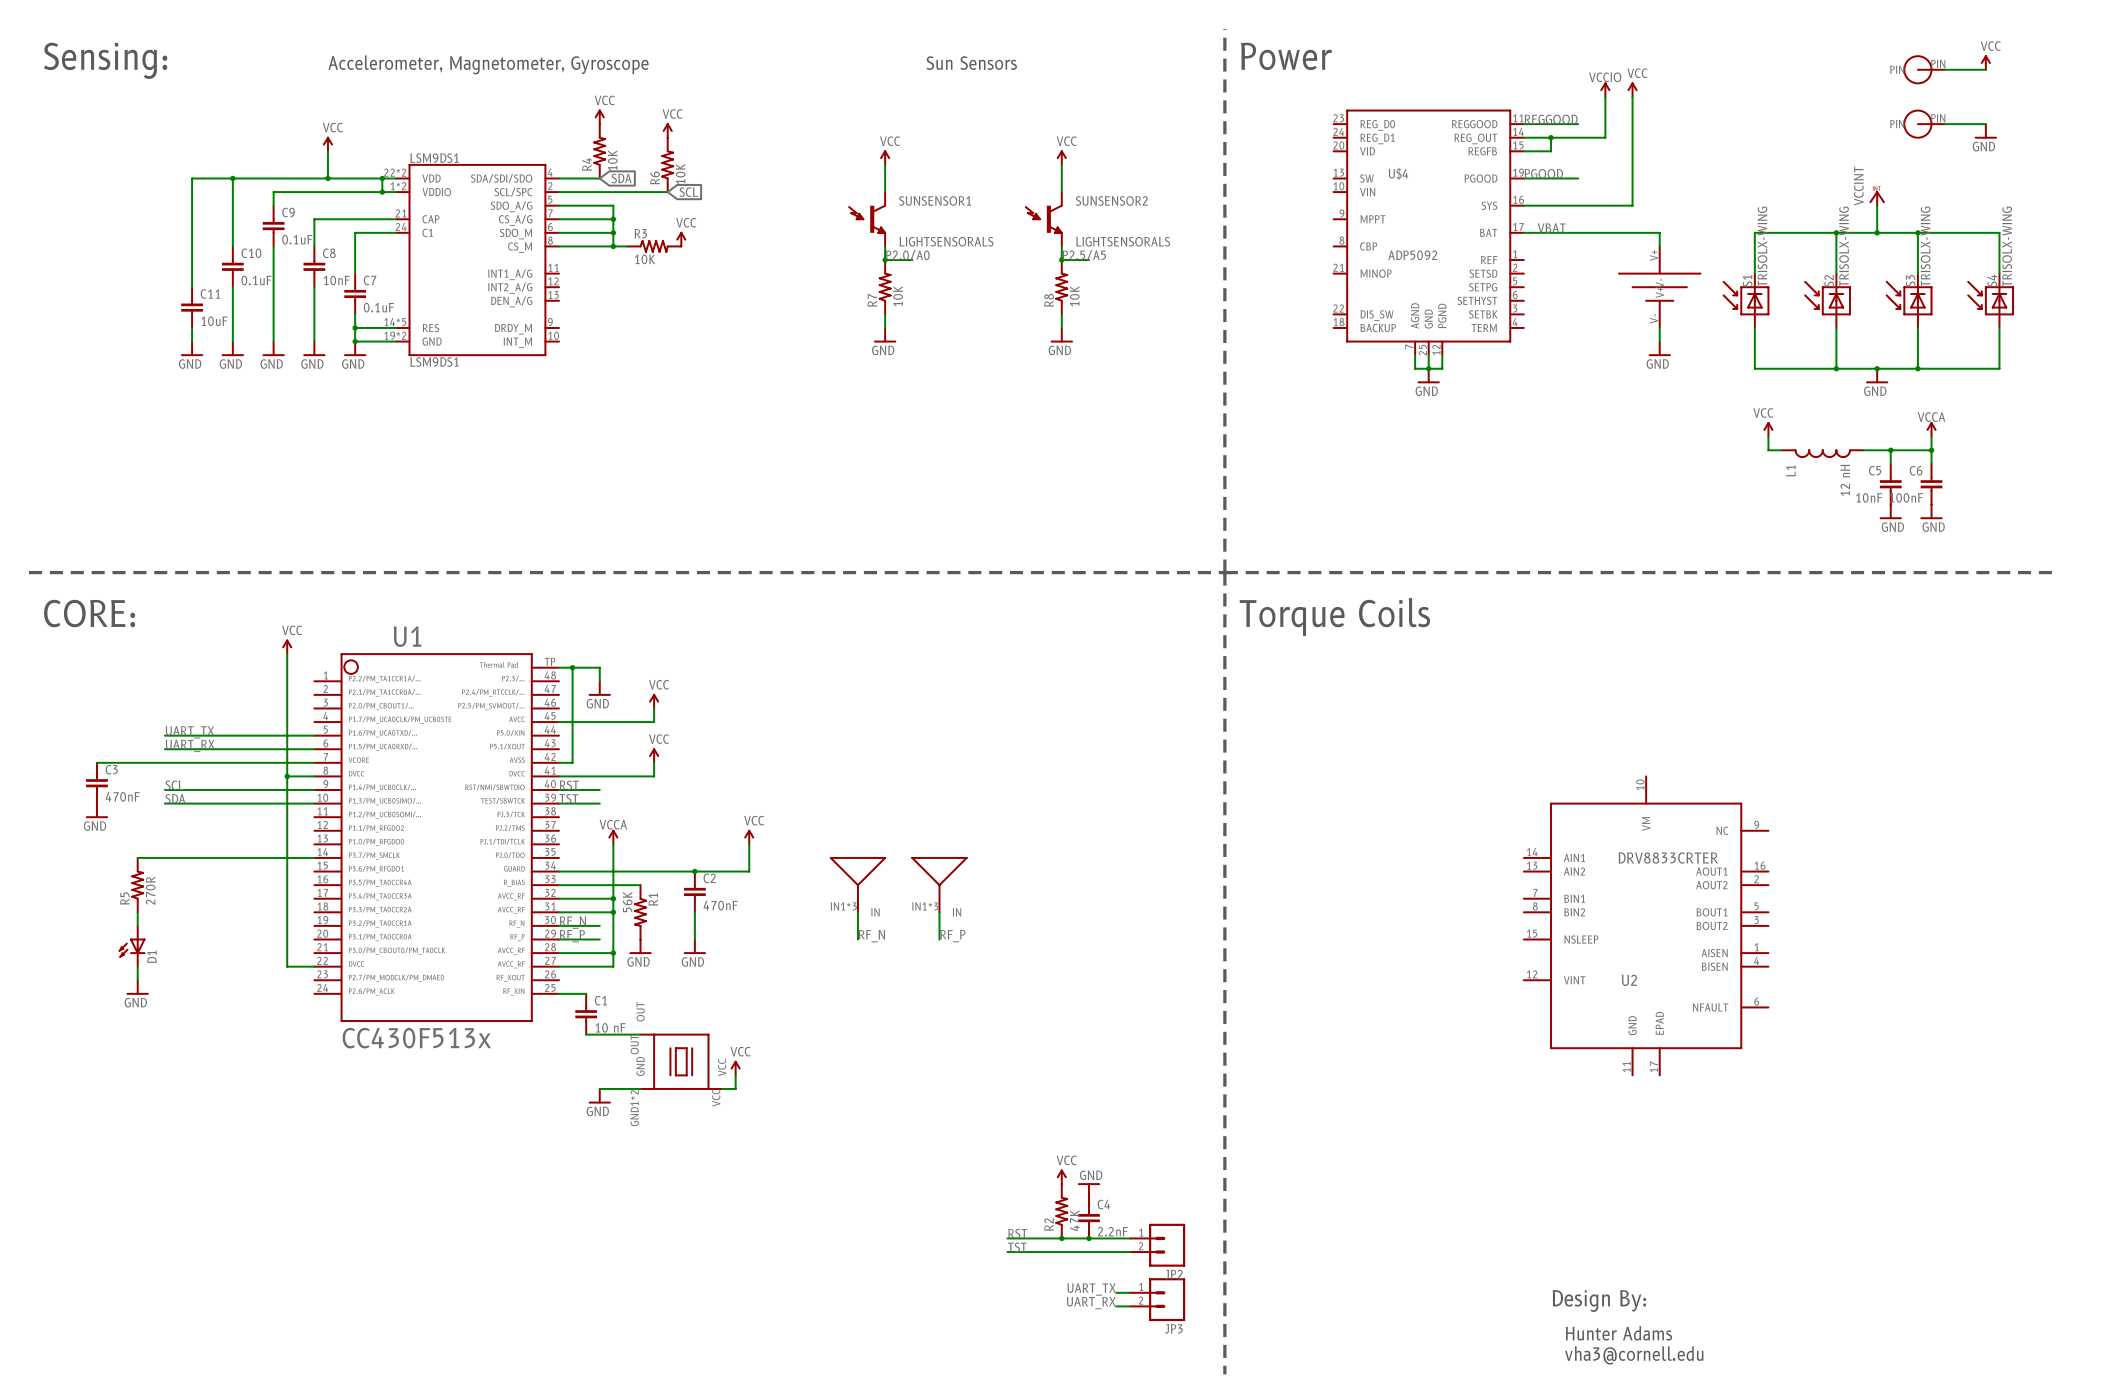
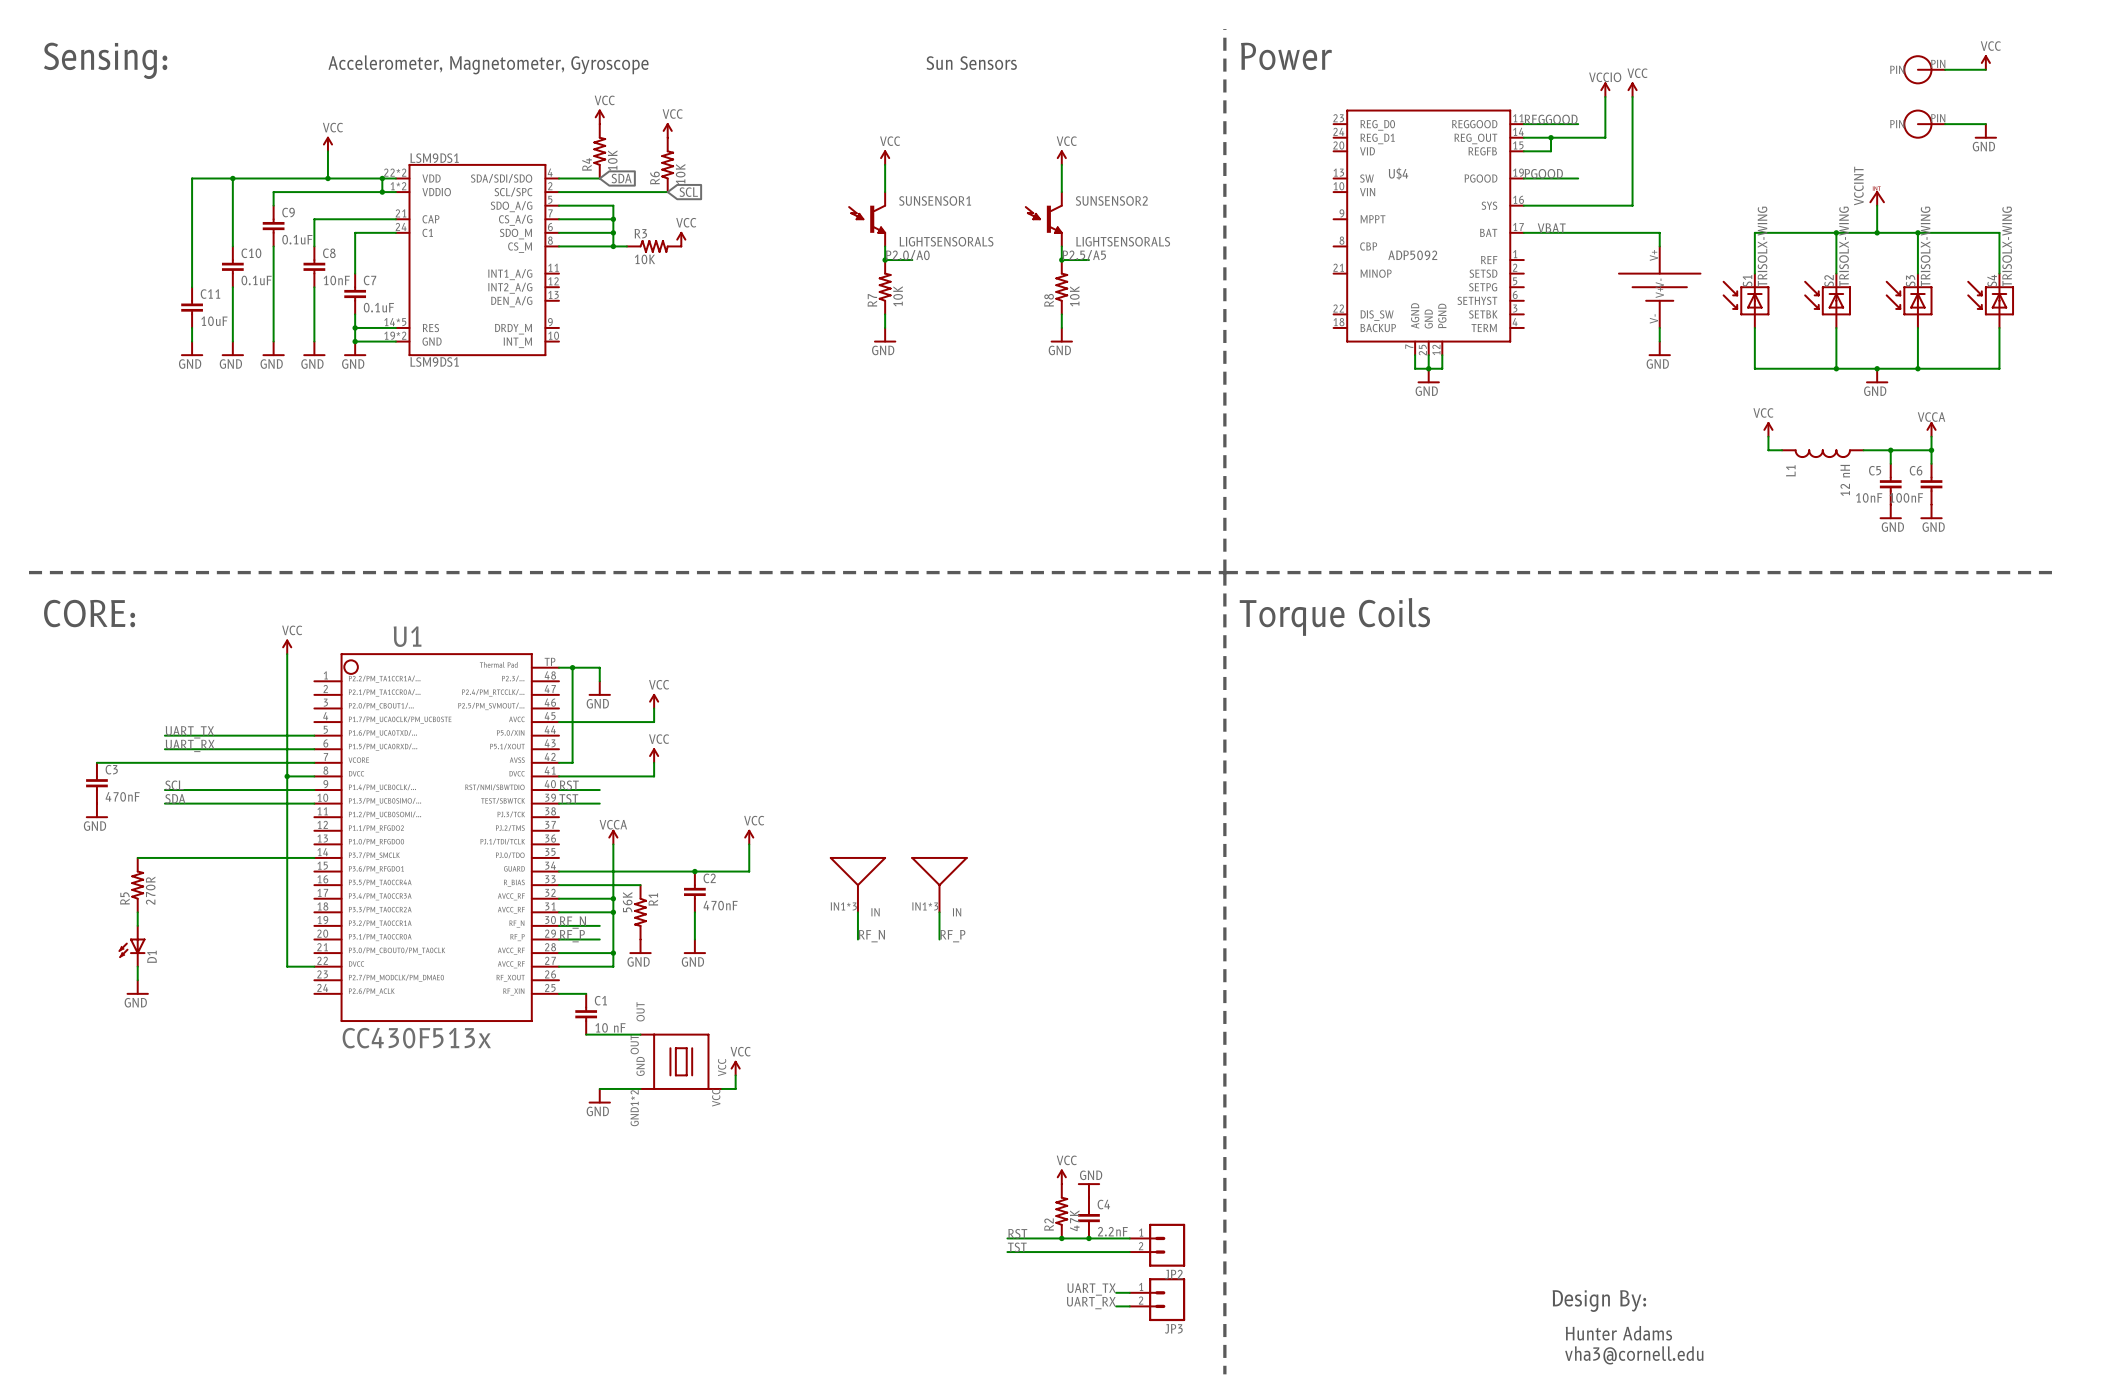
U2: DRV8833CRTER (1646, 925) -> none

